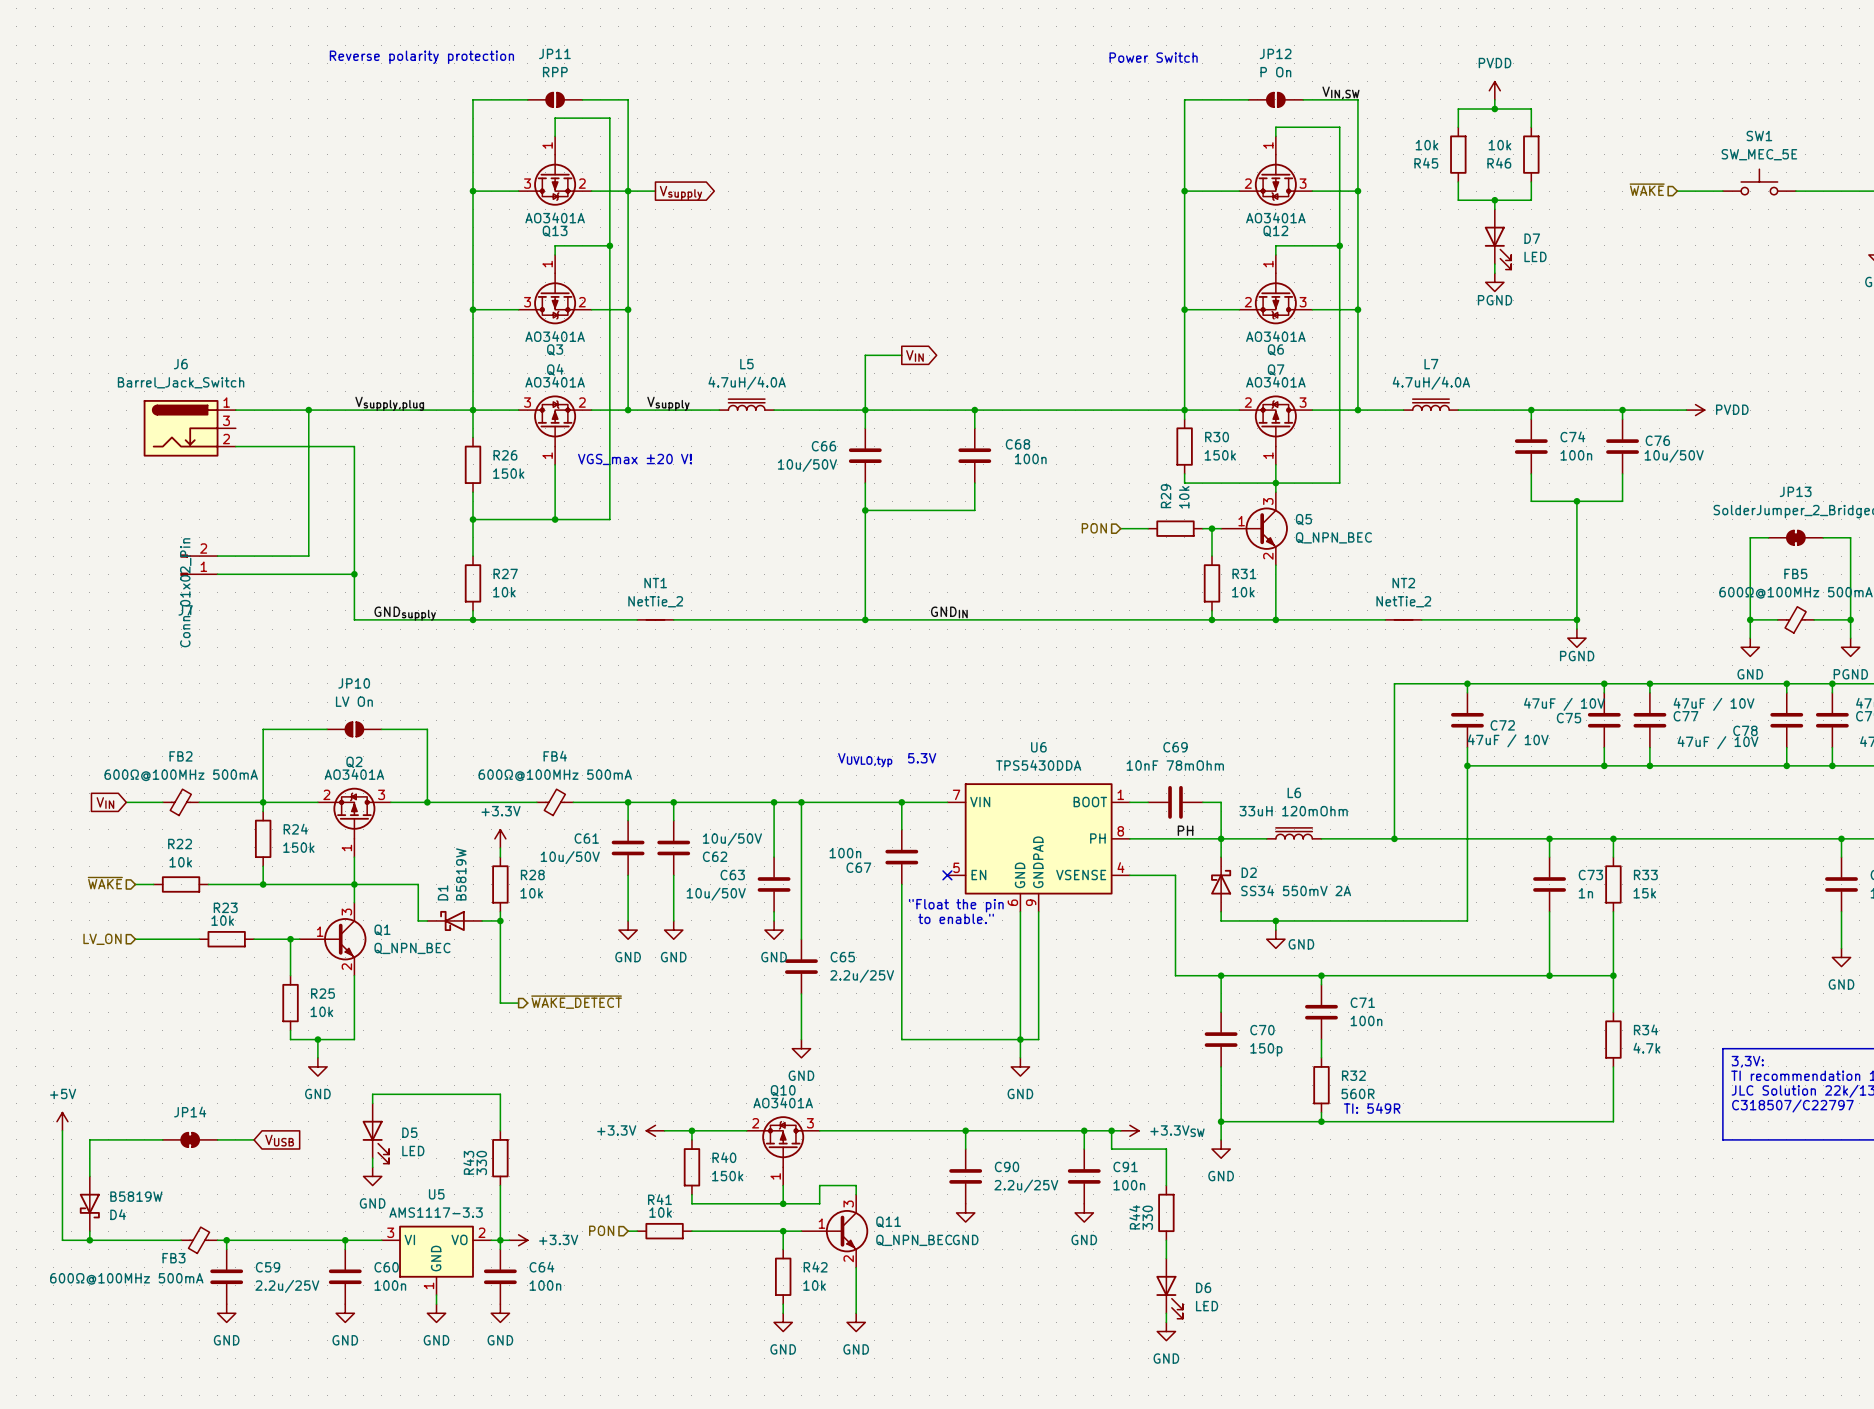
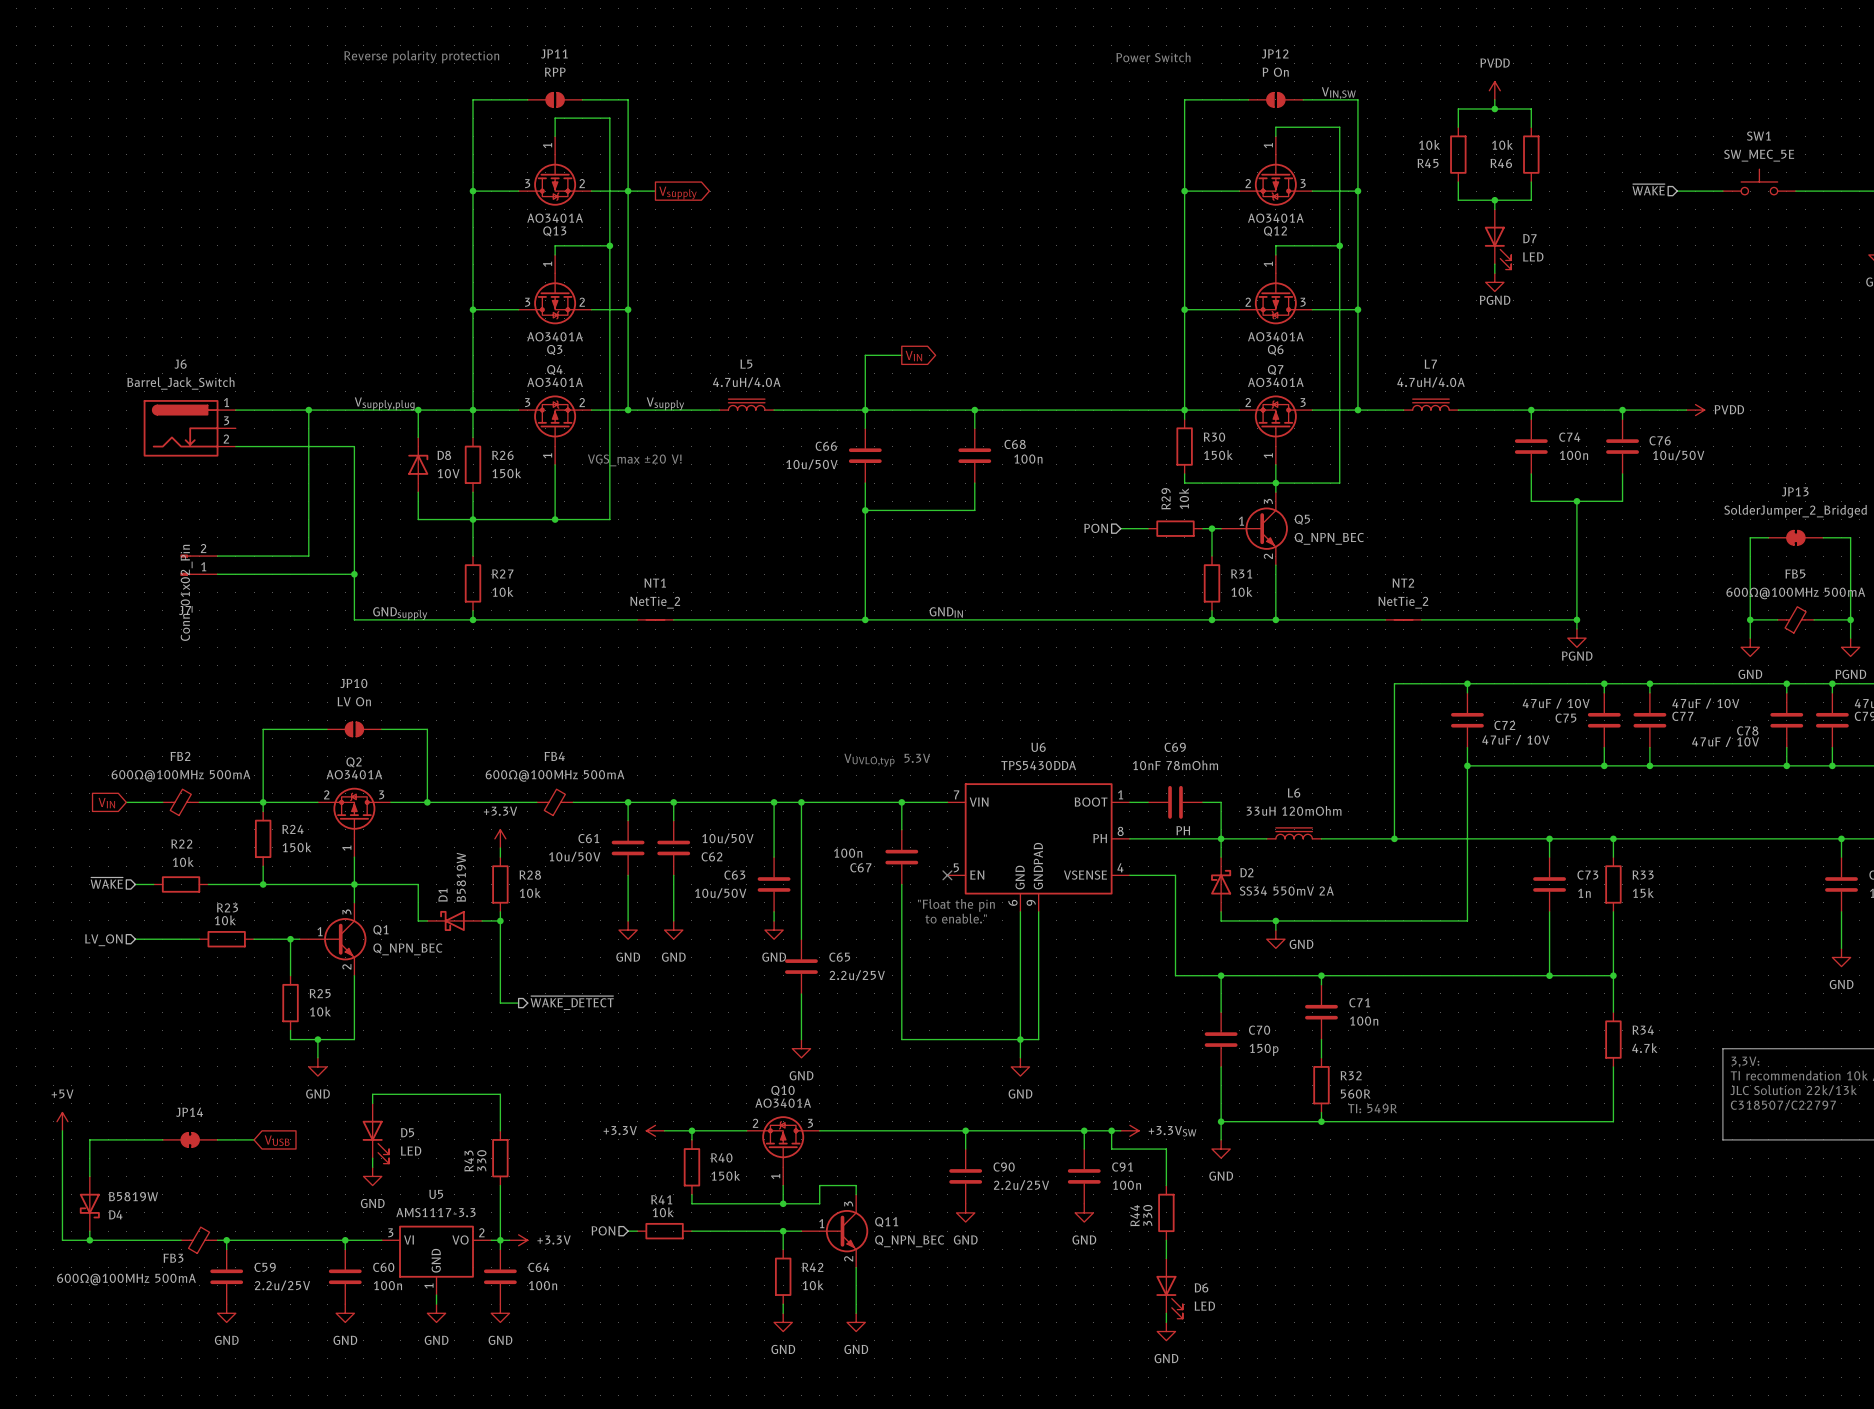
wire: none -> (418, 410) (418, 437)
junction: none -> (418, 410)
D8: none -> 10V (418, 464)
wire: none -> (418, 492) (418, 519) (473, 519)

